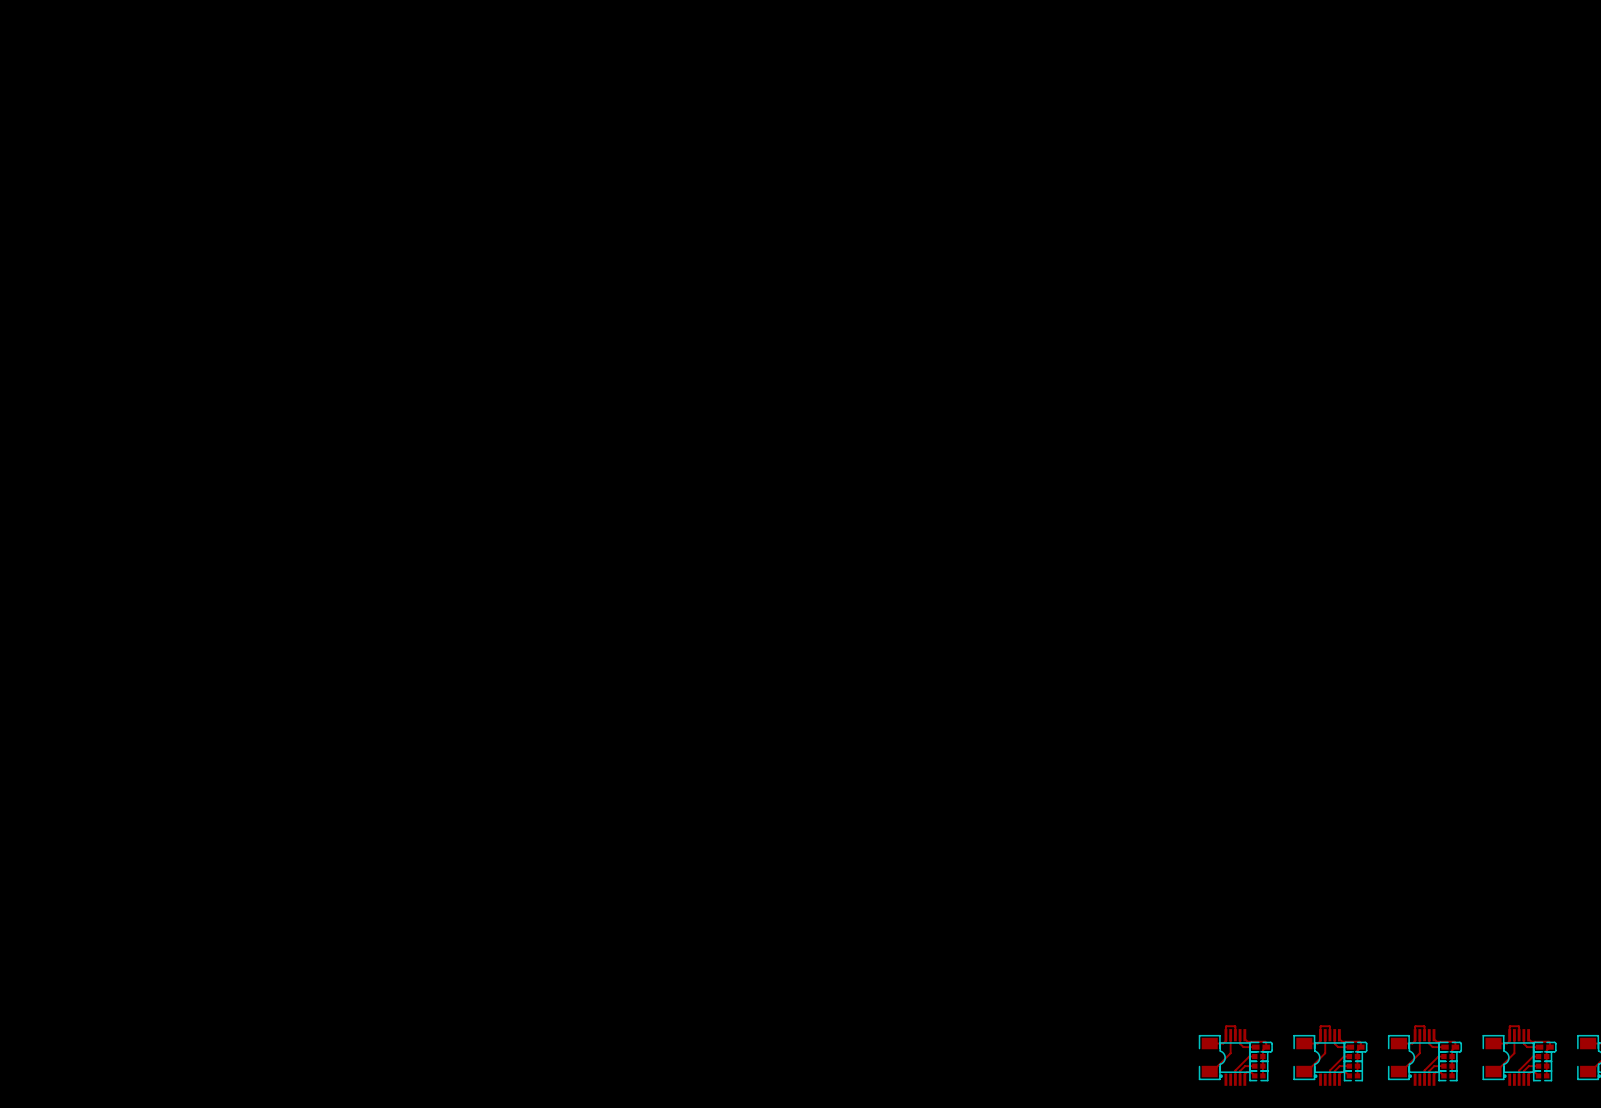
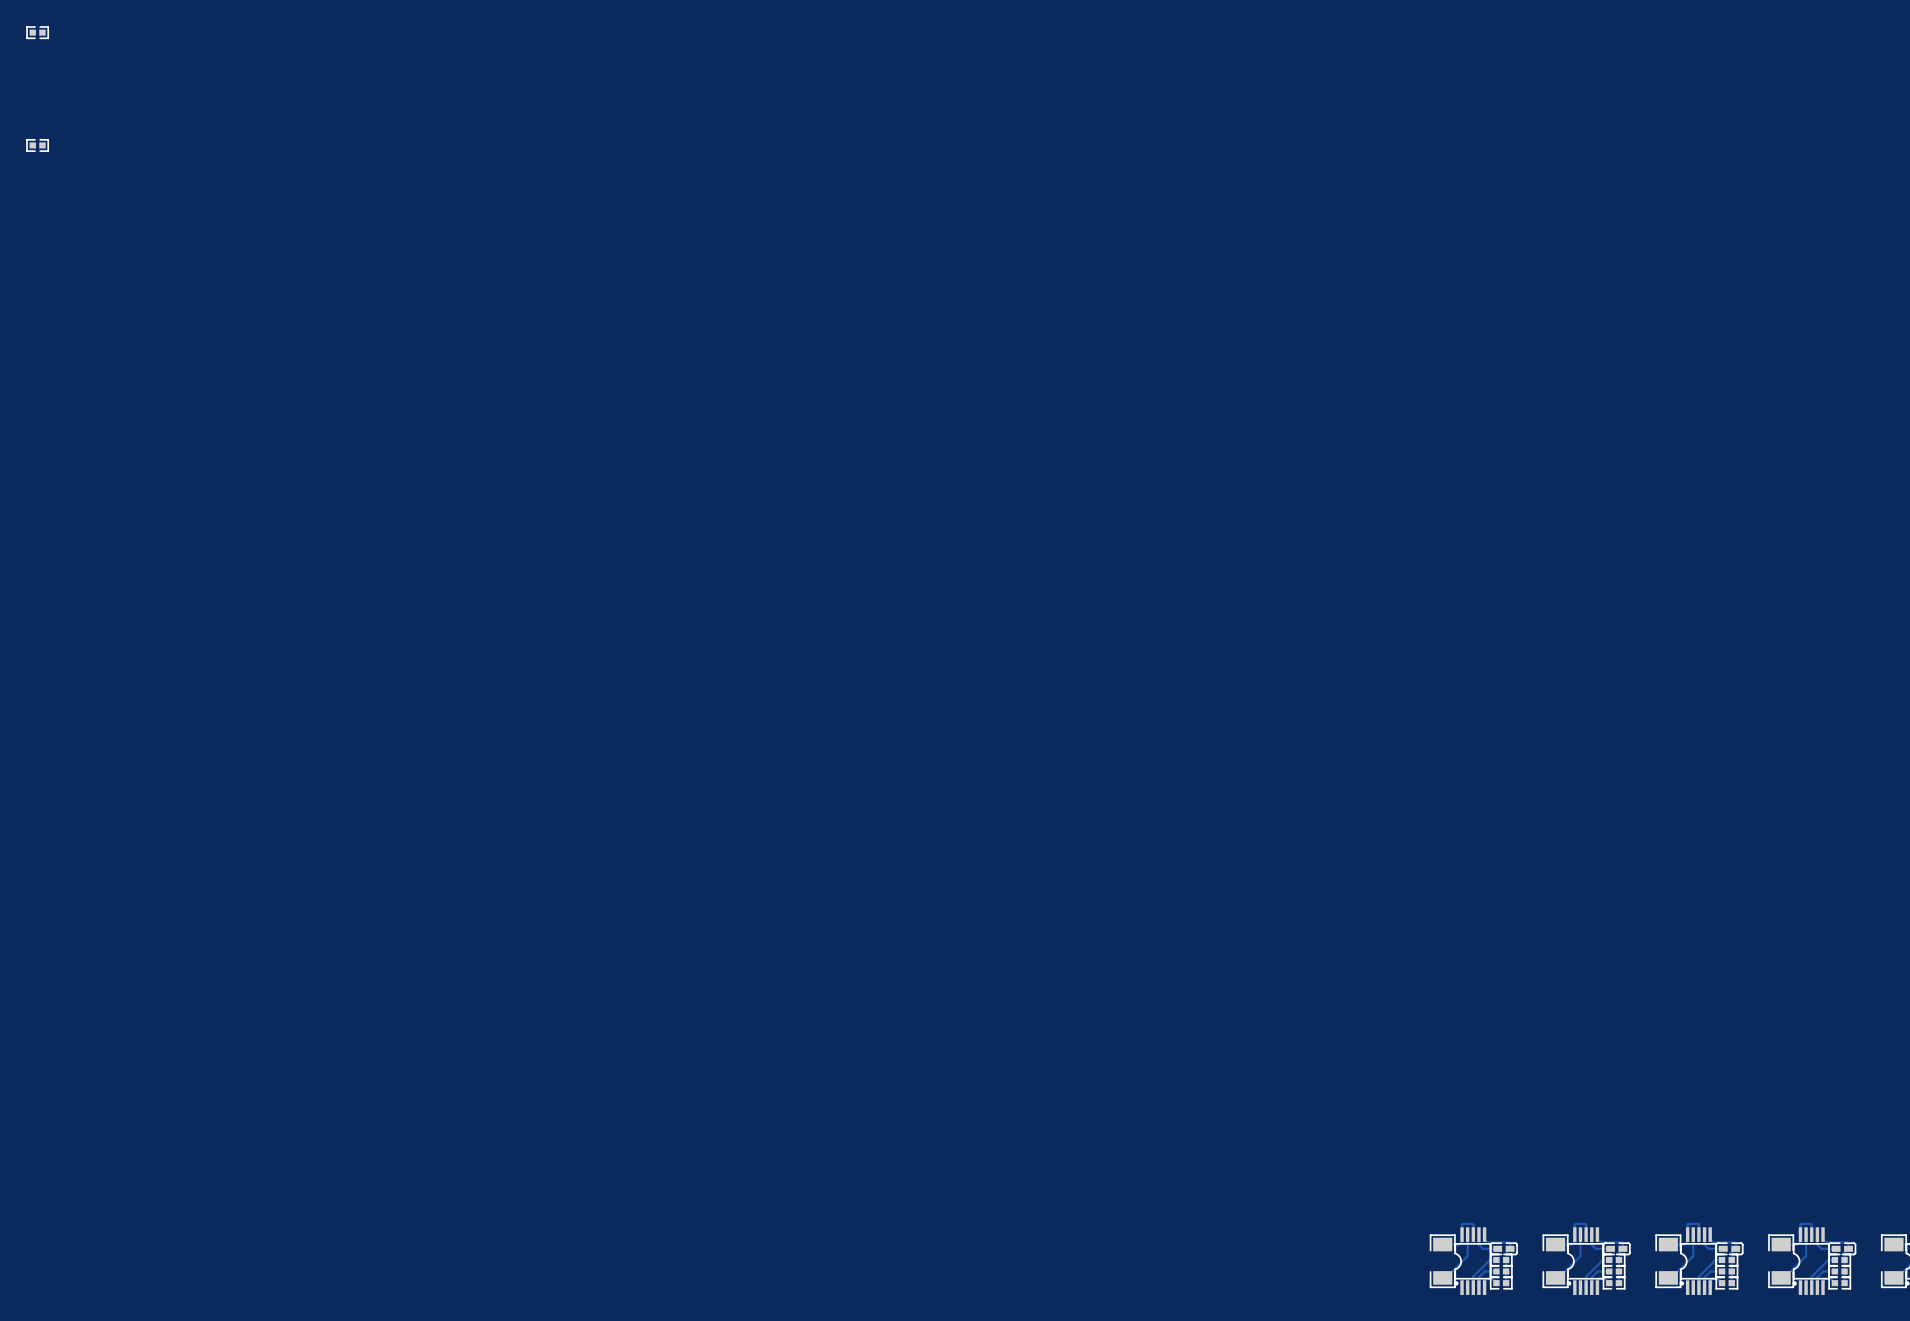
part: none -> (37, 32)
part: none -> (37, 145)

